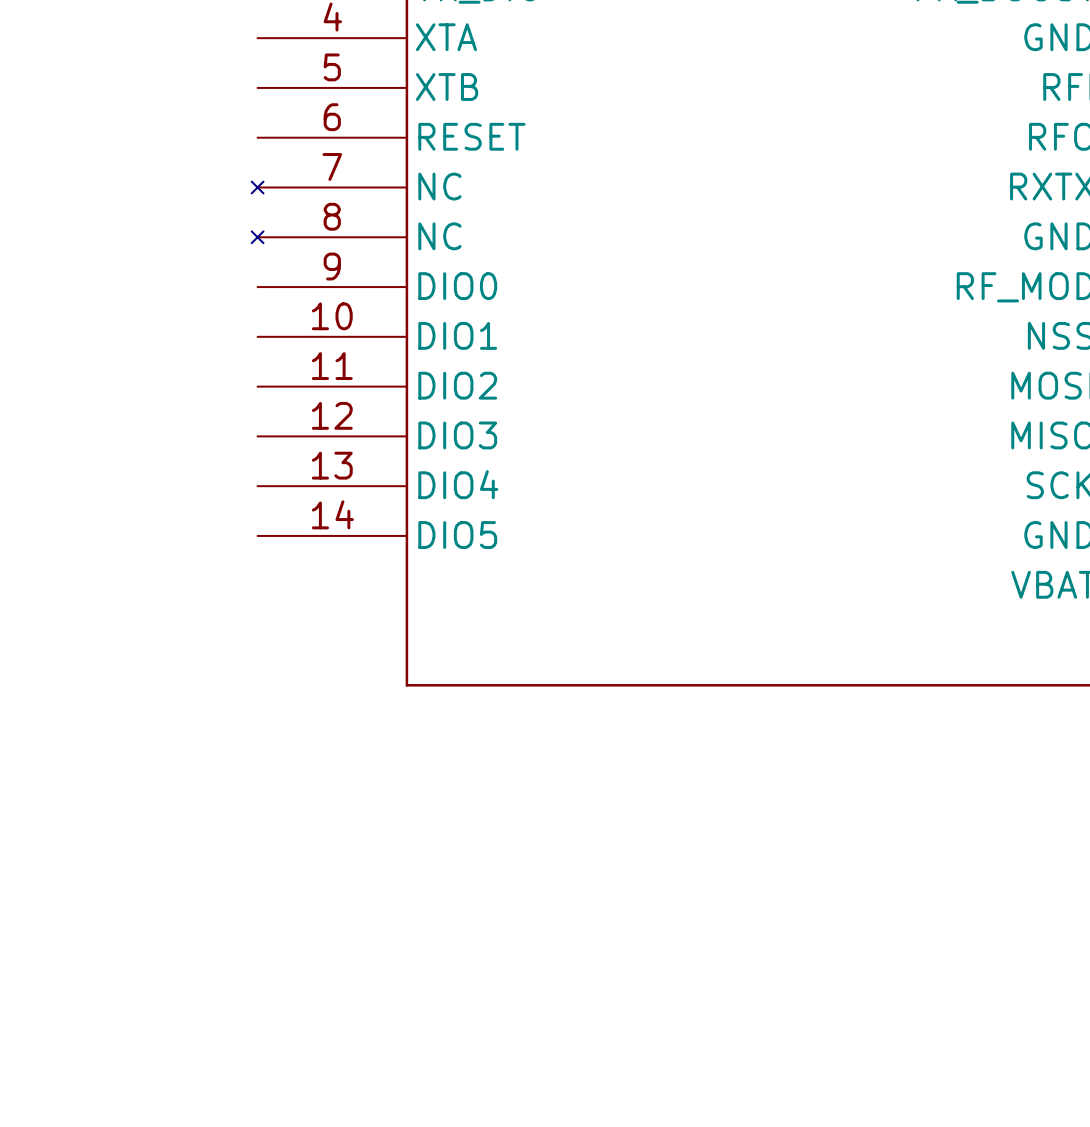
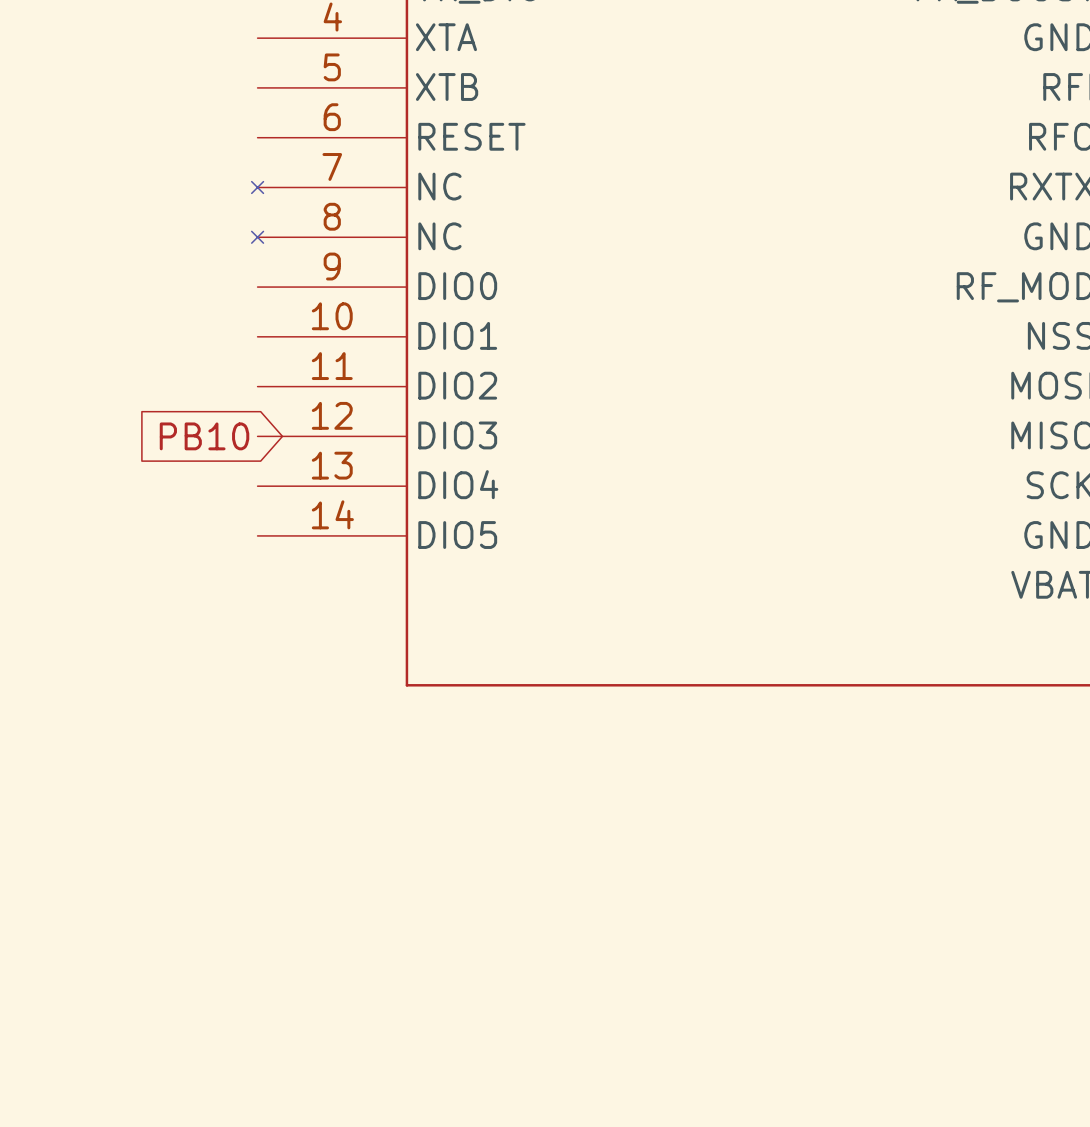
global label: none -> PB10 (204, 436)

